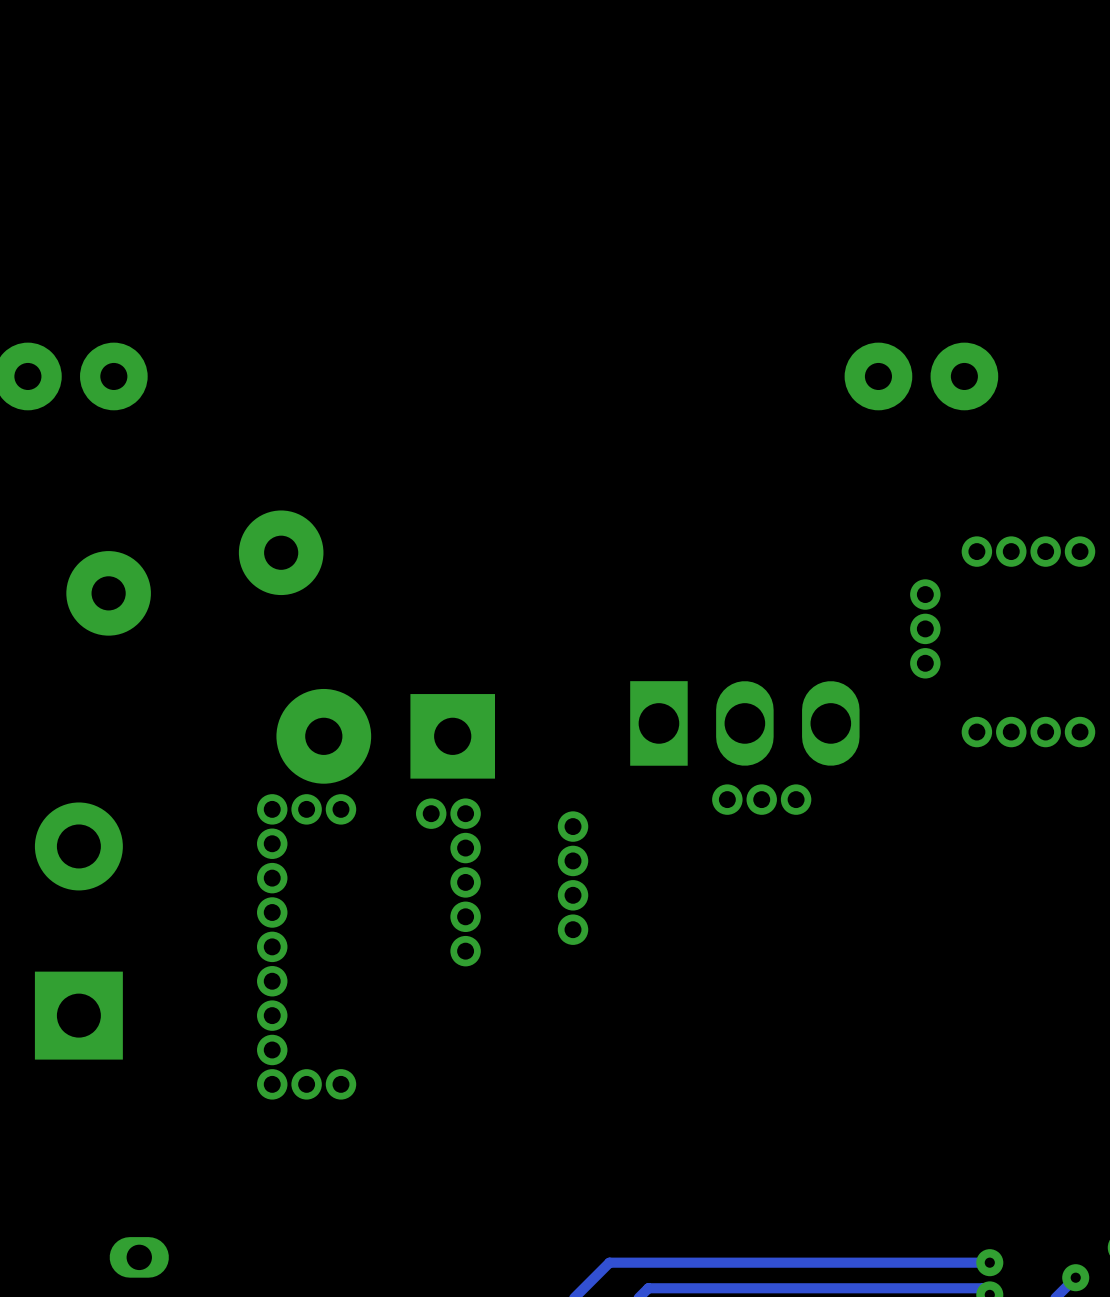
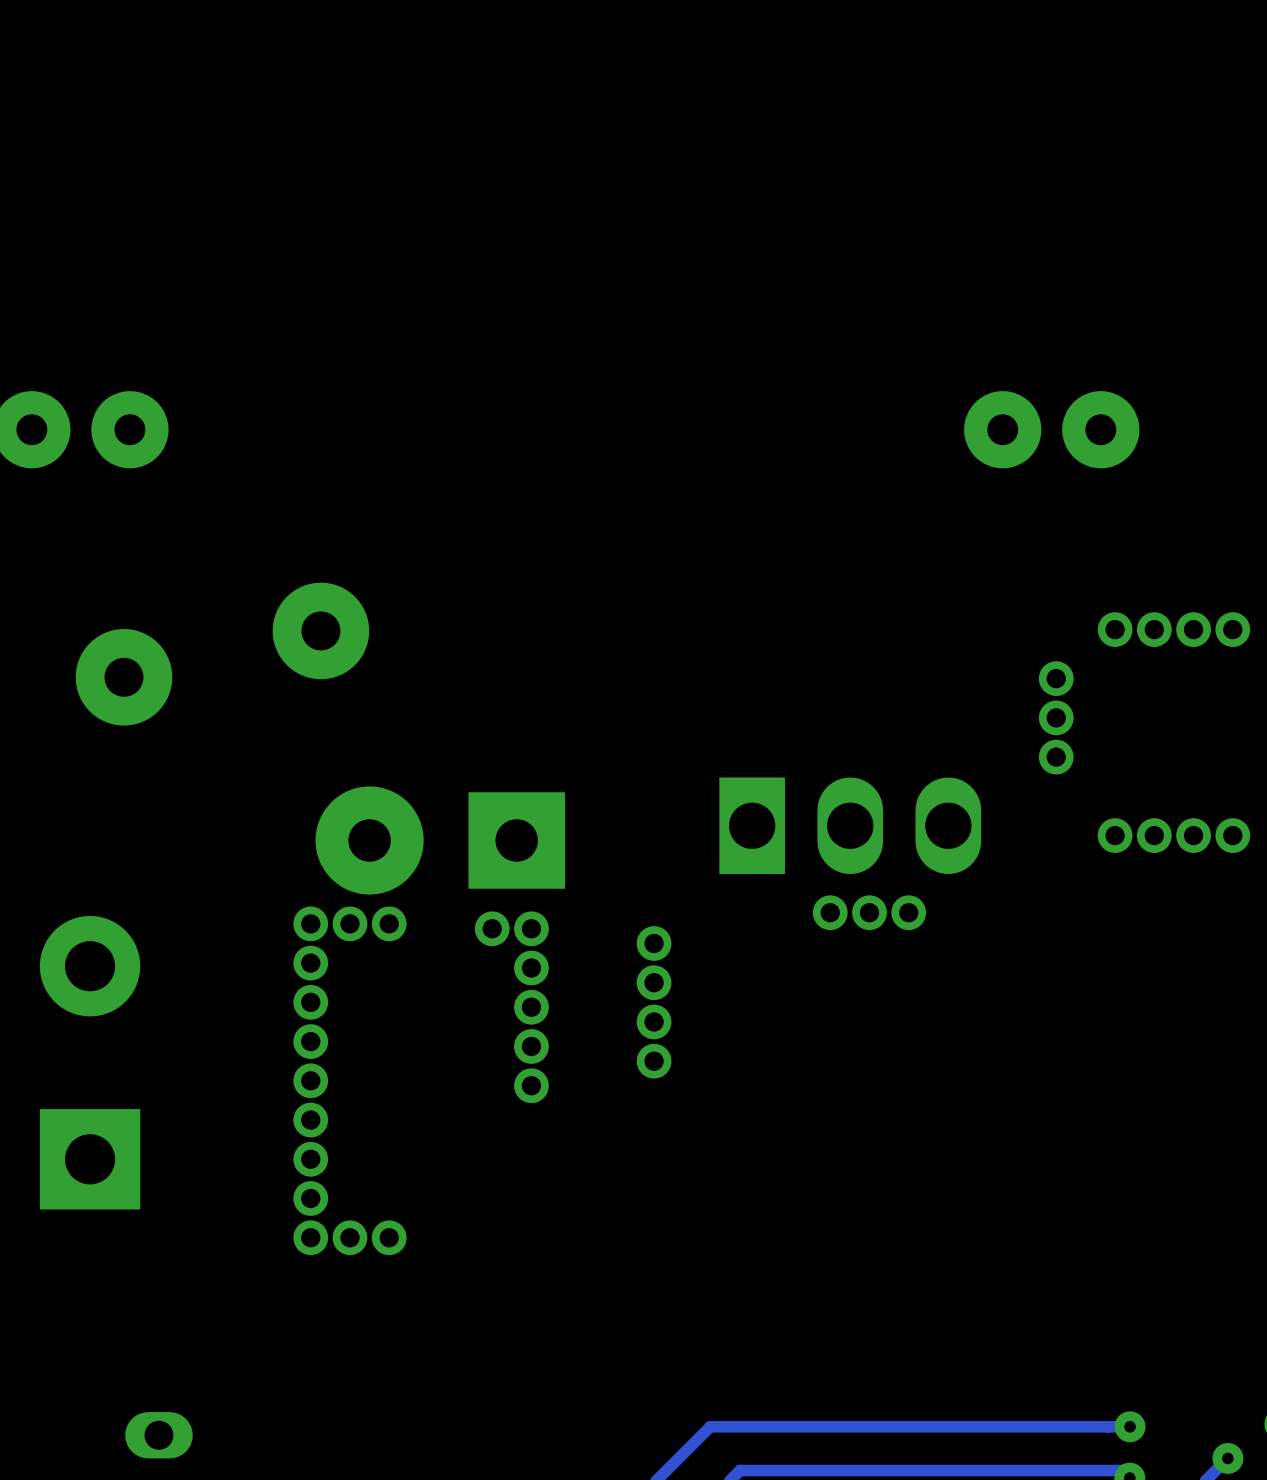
track: (989, 1262) (609, 1262) -> (1130, 1426) (710, 1426) (695, 1441)
via position: (989, 1262) -> (1130, 1426)

